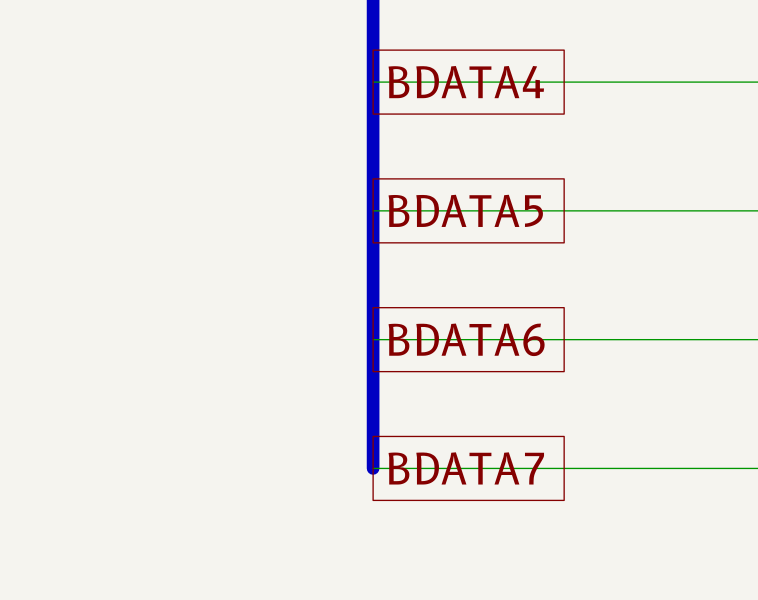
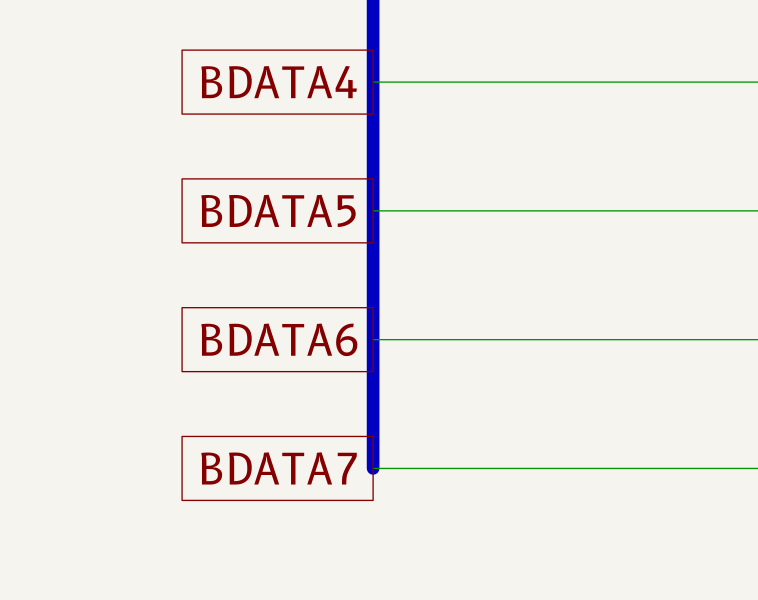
global label rotation: 0° (466, 82) -> 180° (279, 82)
global label rotation: 0° (465, 210) -> 180° (278, 210)
global label rotation: 0° (466, 339) -> 180° (279, 339)
global label rotation: 0° (466, 468) -> 180° (279, 468)

